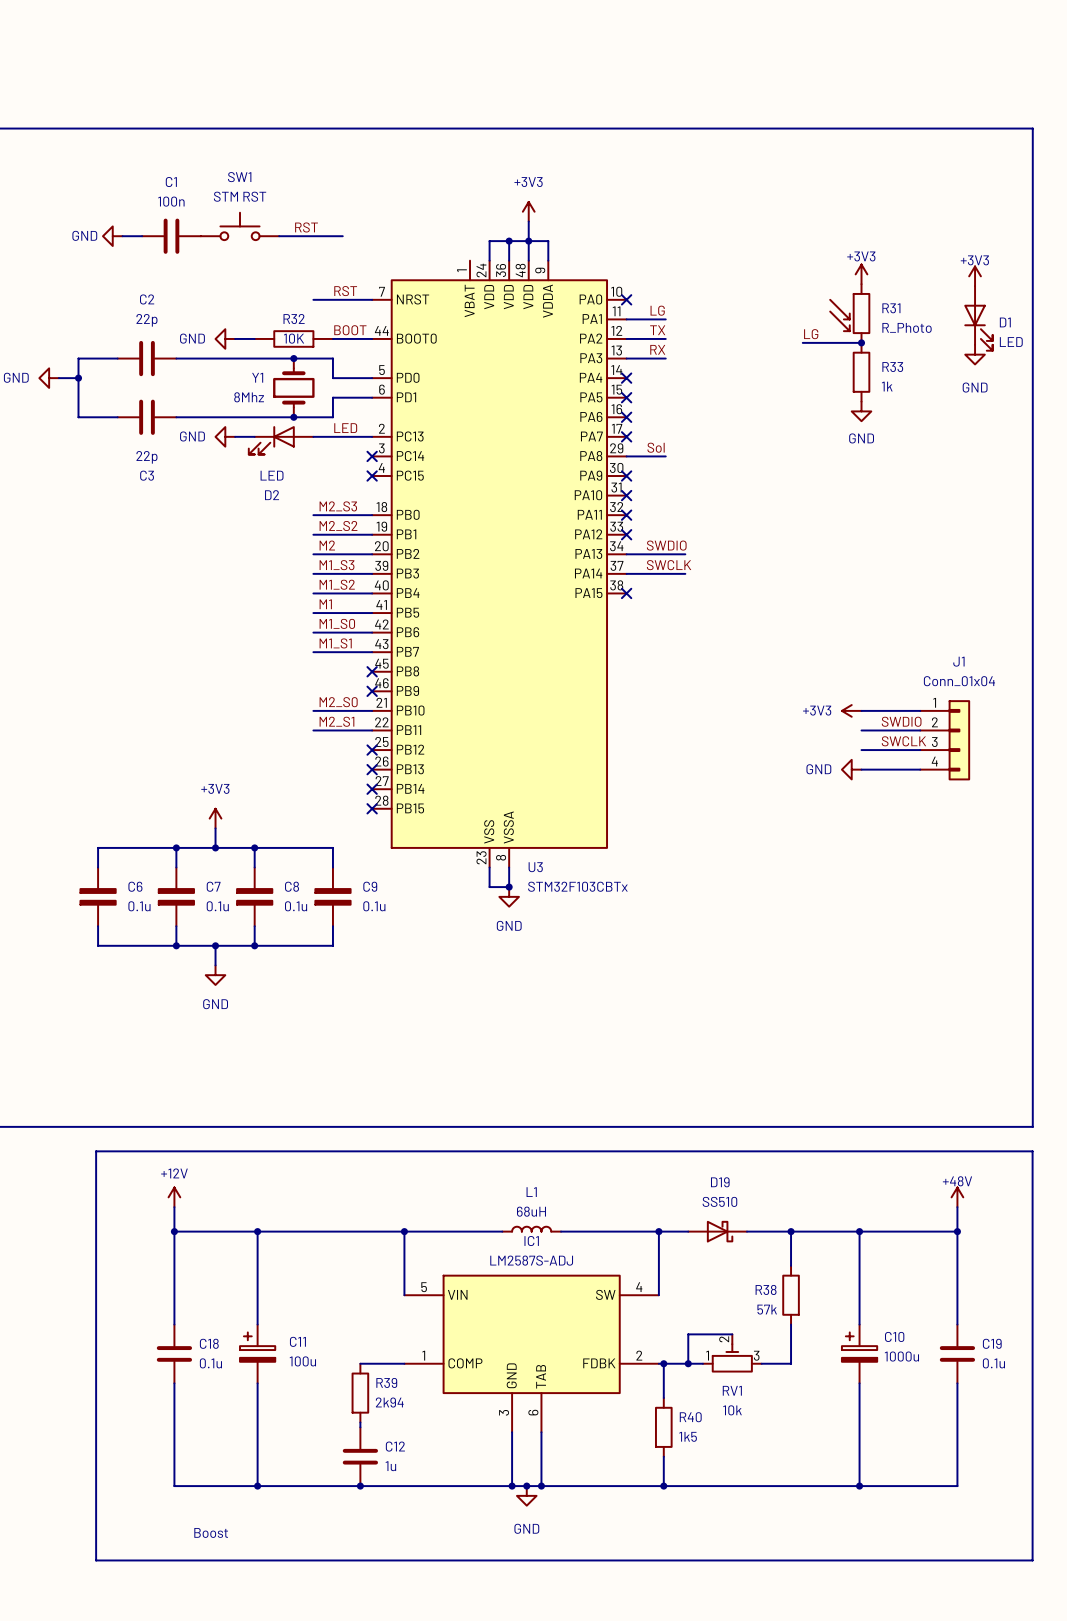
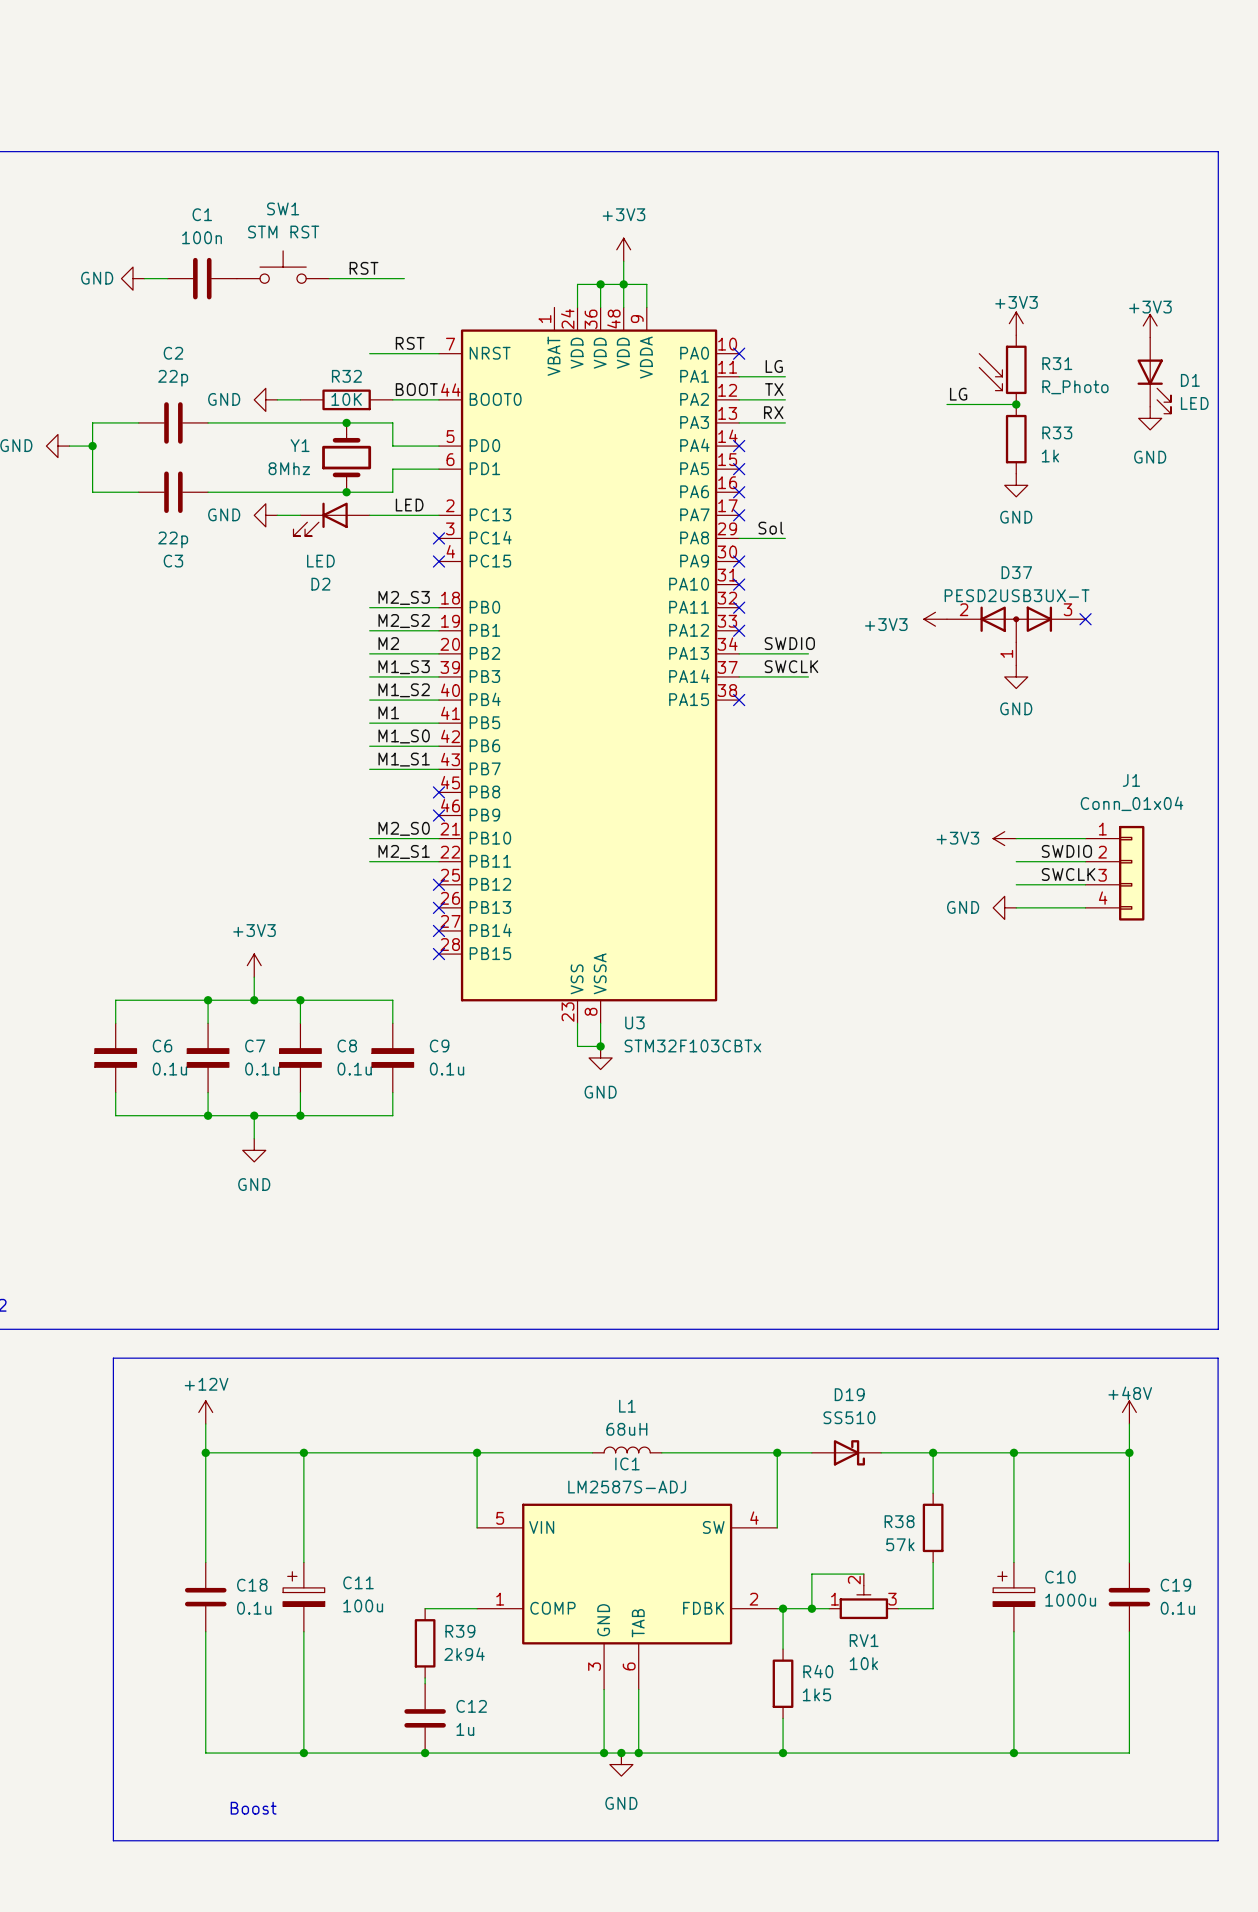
power symbol: none -> +3V3 (935, 619)
no-connect mark: none -> (1085, 619)
D37: none -> PESD2USB3UX-T (1016, 635)
power symbol: none -> GND (1016, 676)

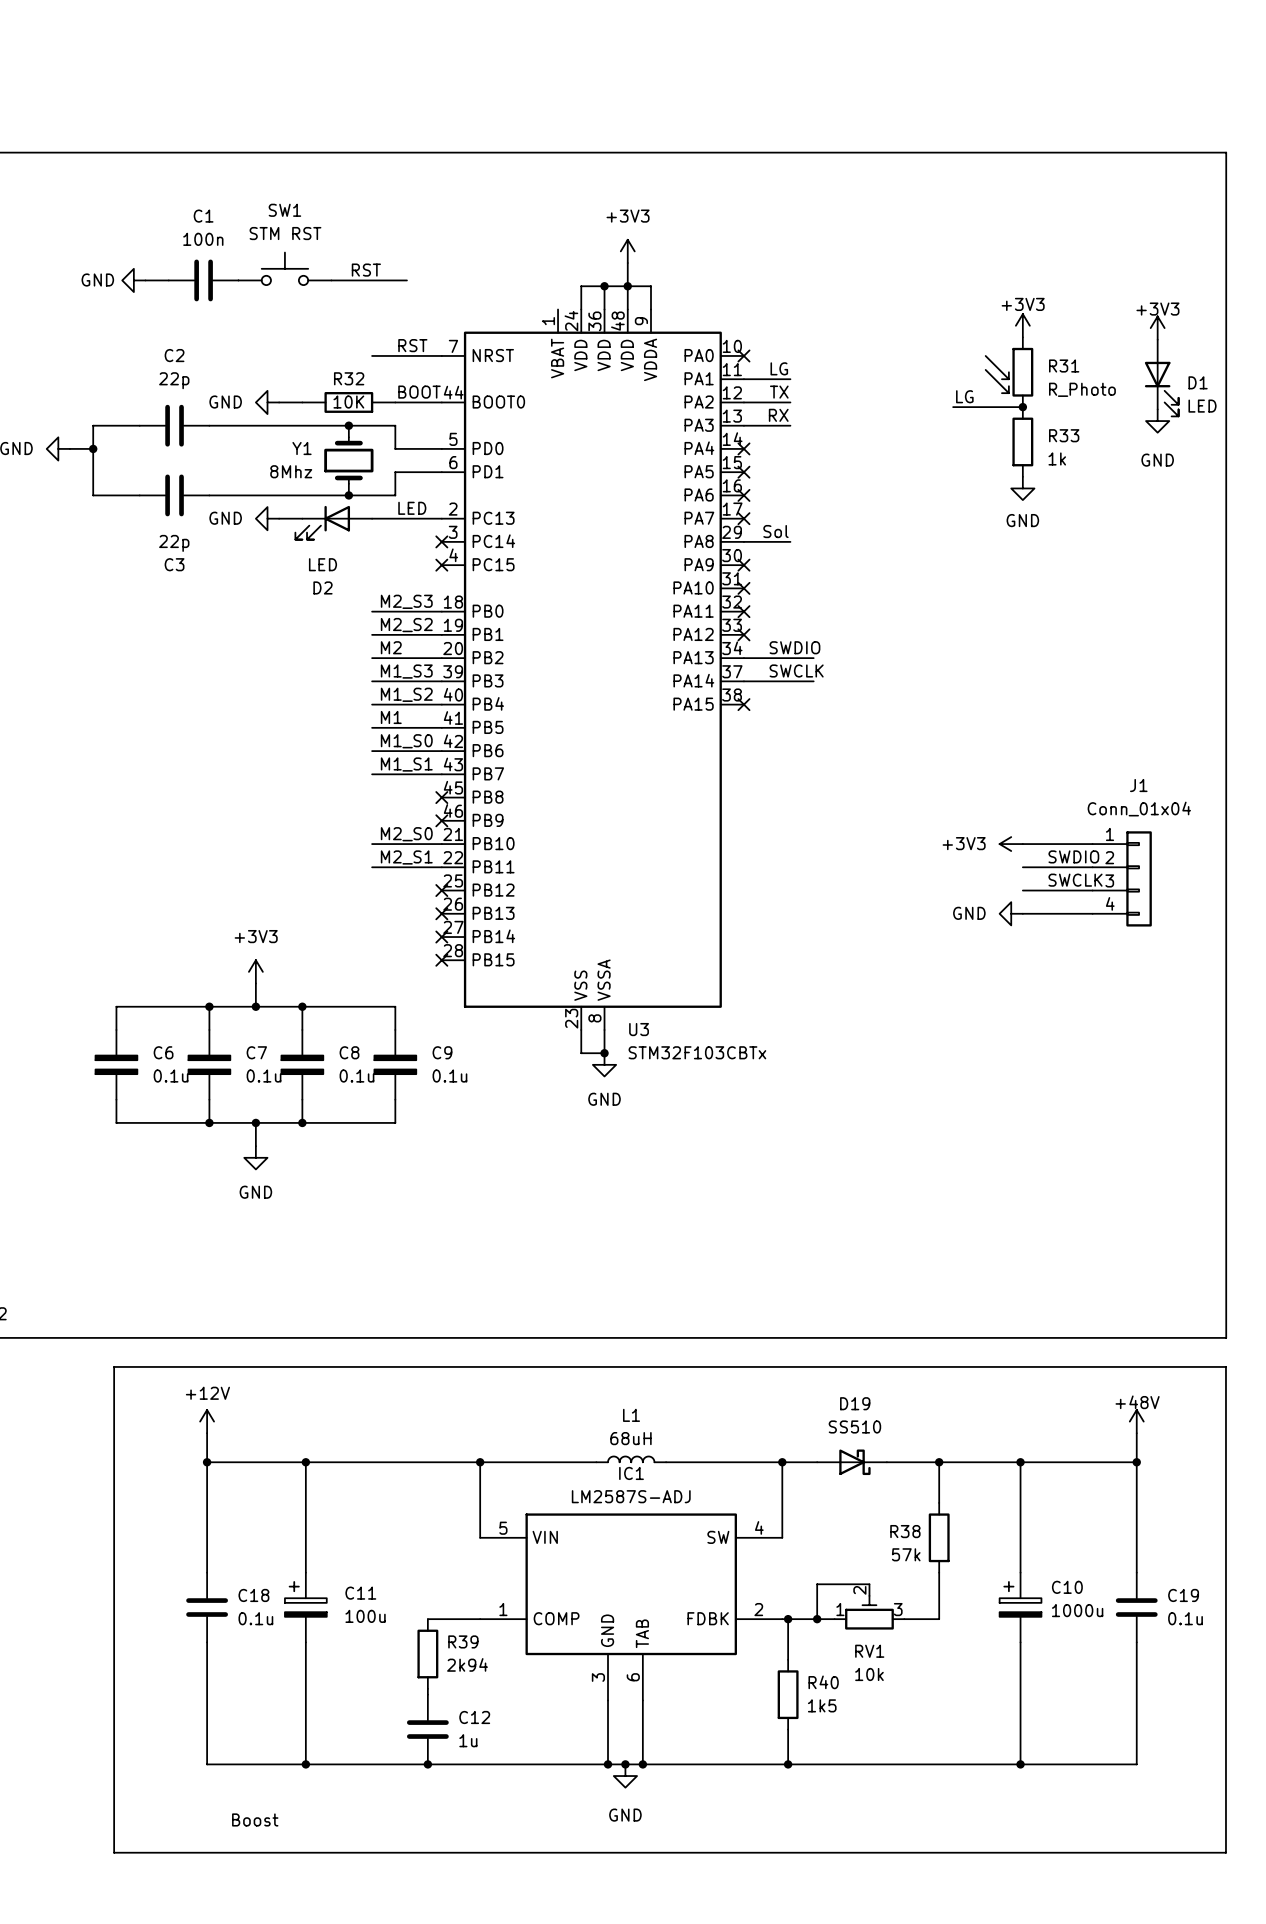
power symbol: +3V3 (935, 619) -> none
no-connect mark: (1085, 619) -> none
D37: PESD2USB3UX-T (1016, 635) -> none
power symbol: GND (1016, 676) -> none

